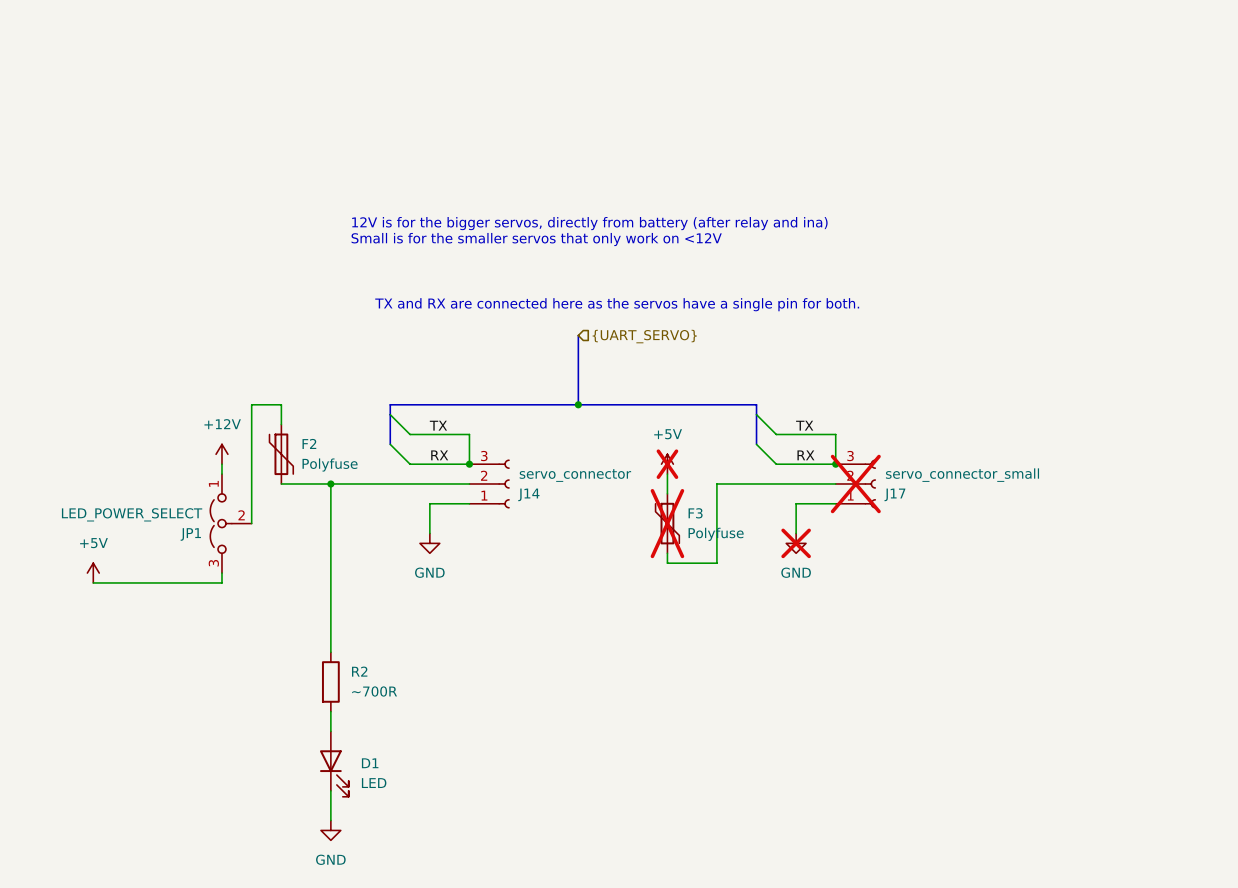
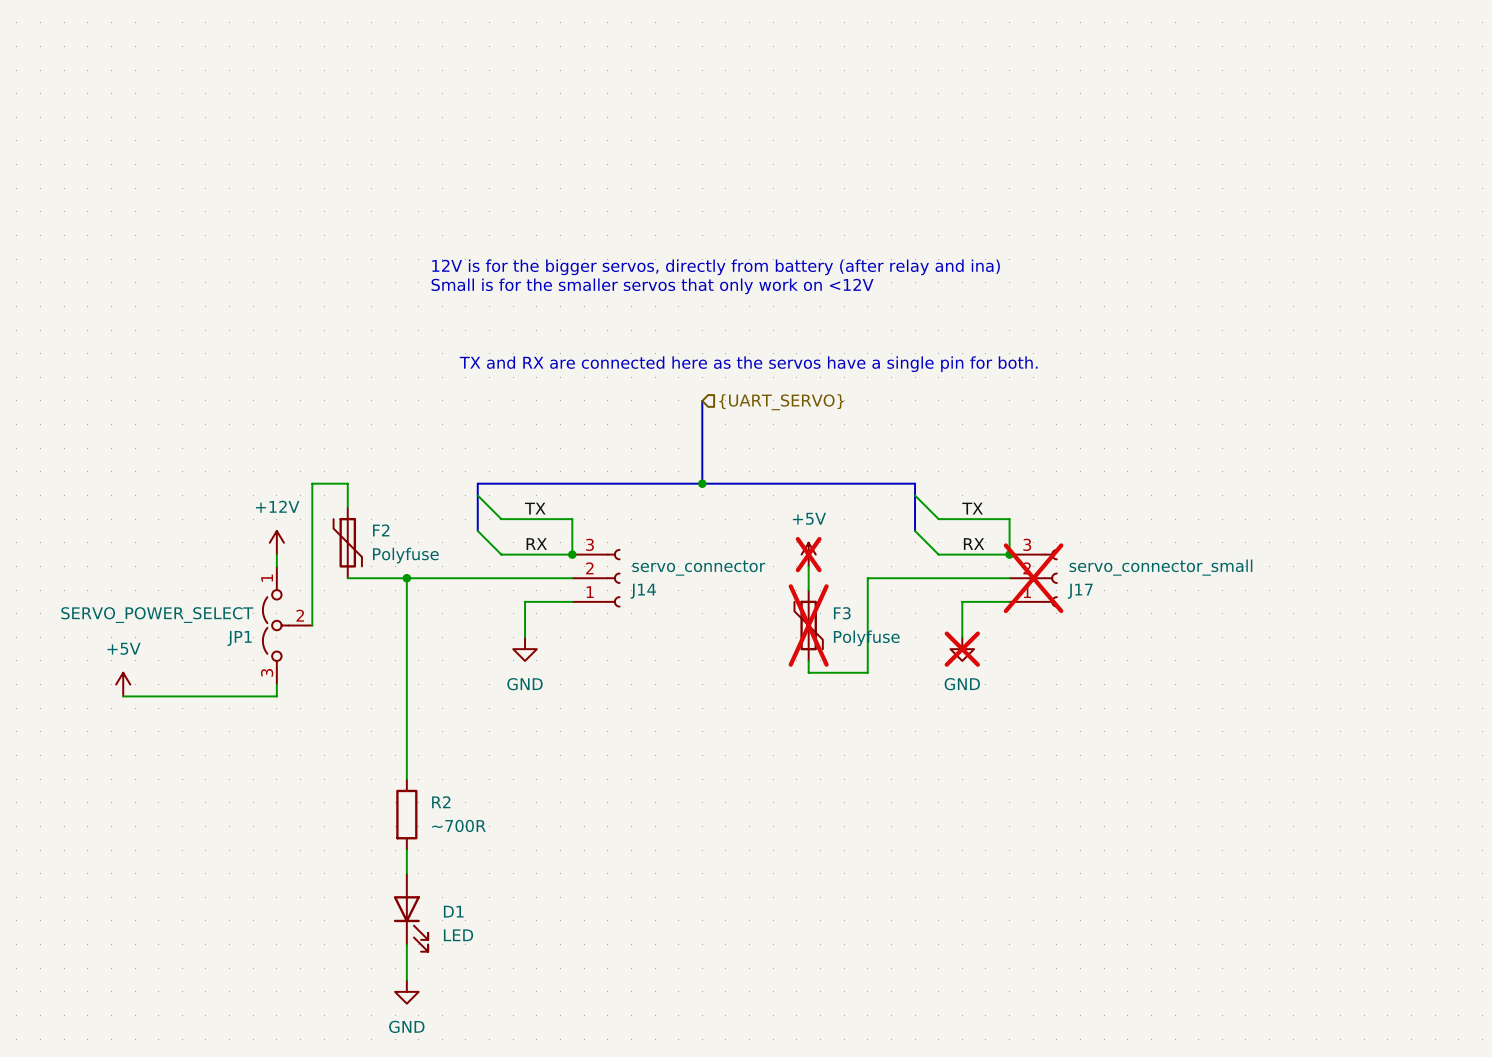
JP1 value: LED_POWER_SELECT (132, 514) -> SERVO_POWER_SELECT (157, 615)

